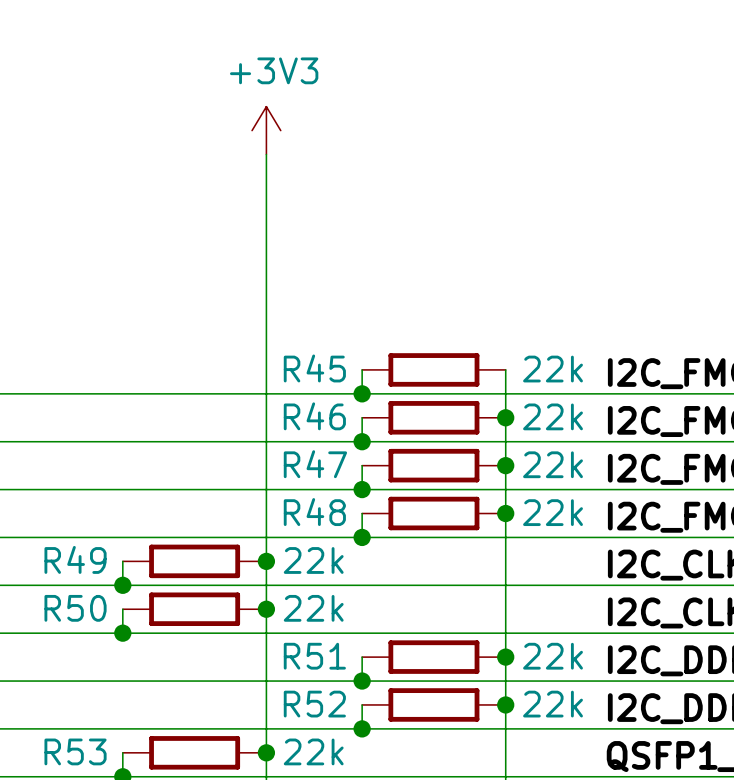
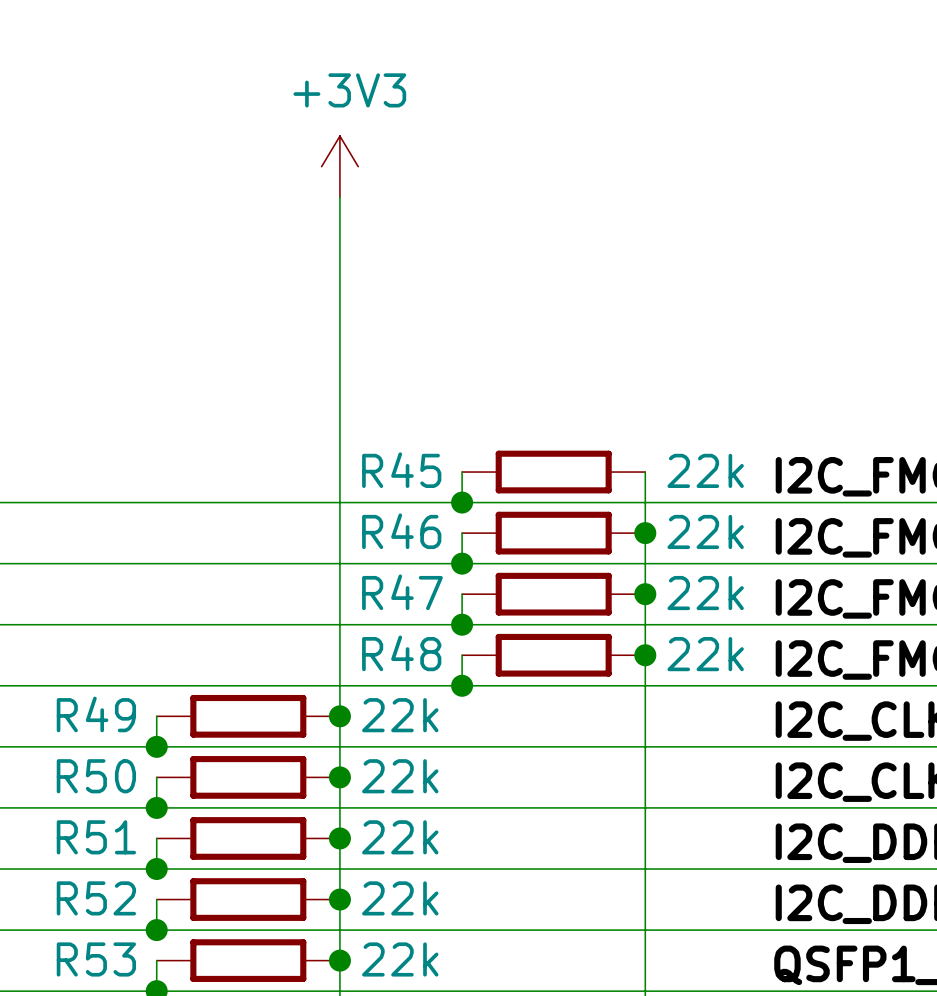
junction: none -> (339, 838)
wire: (362, 657) (362, 681) -> (156, 838) (156, 869)
R51 position: (433, 657) -> (248, 838)
junction: (505, 657) -> none
junction: none -> (156, 869)
junction: (362, 681) -> none
junction: none -> (339, 899)
wire: (362, 704) (362, 728) -> (156, 899) (156, 930)
R52 position: (433, 704) -> (248, 899)
junction: (505, 704) -> none
junction: none -> (156, 930)
junction: (362, 728) -> none

